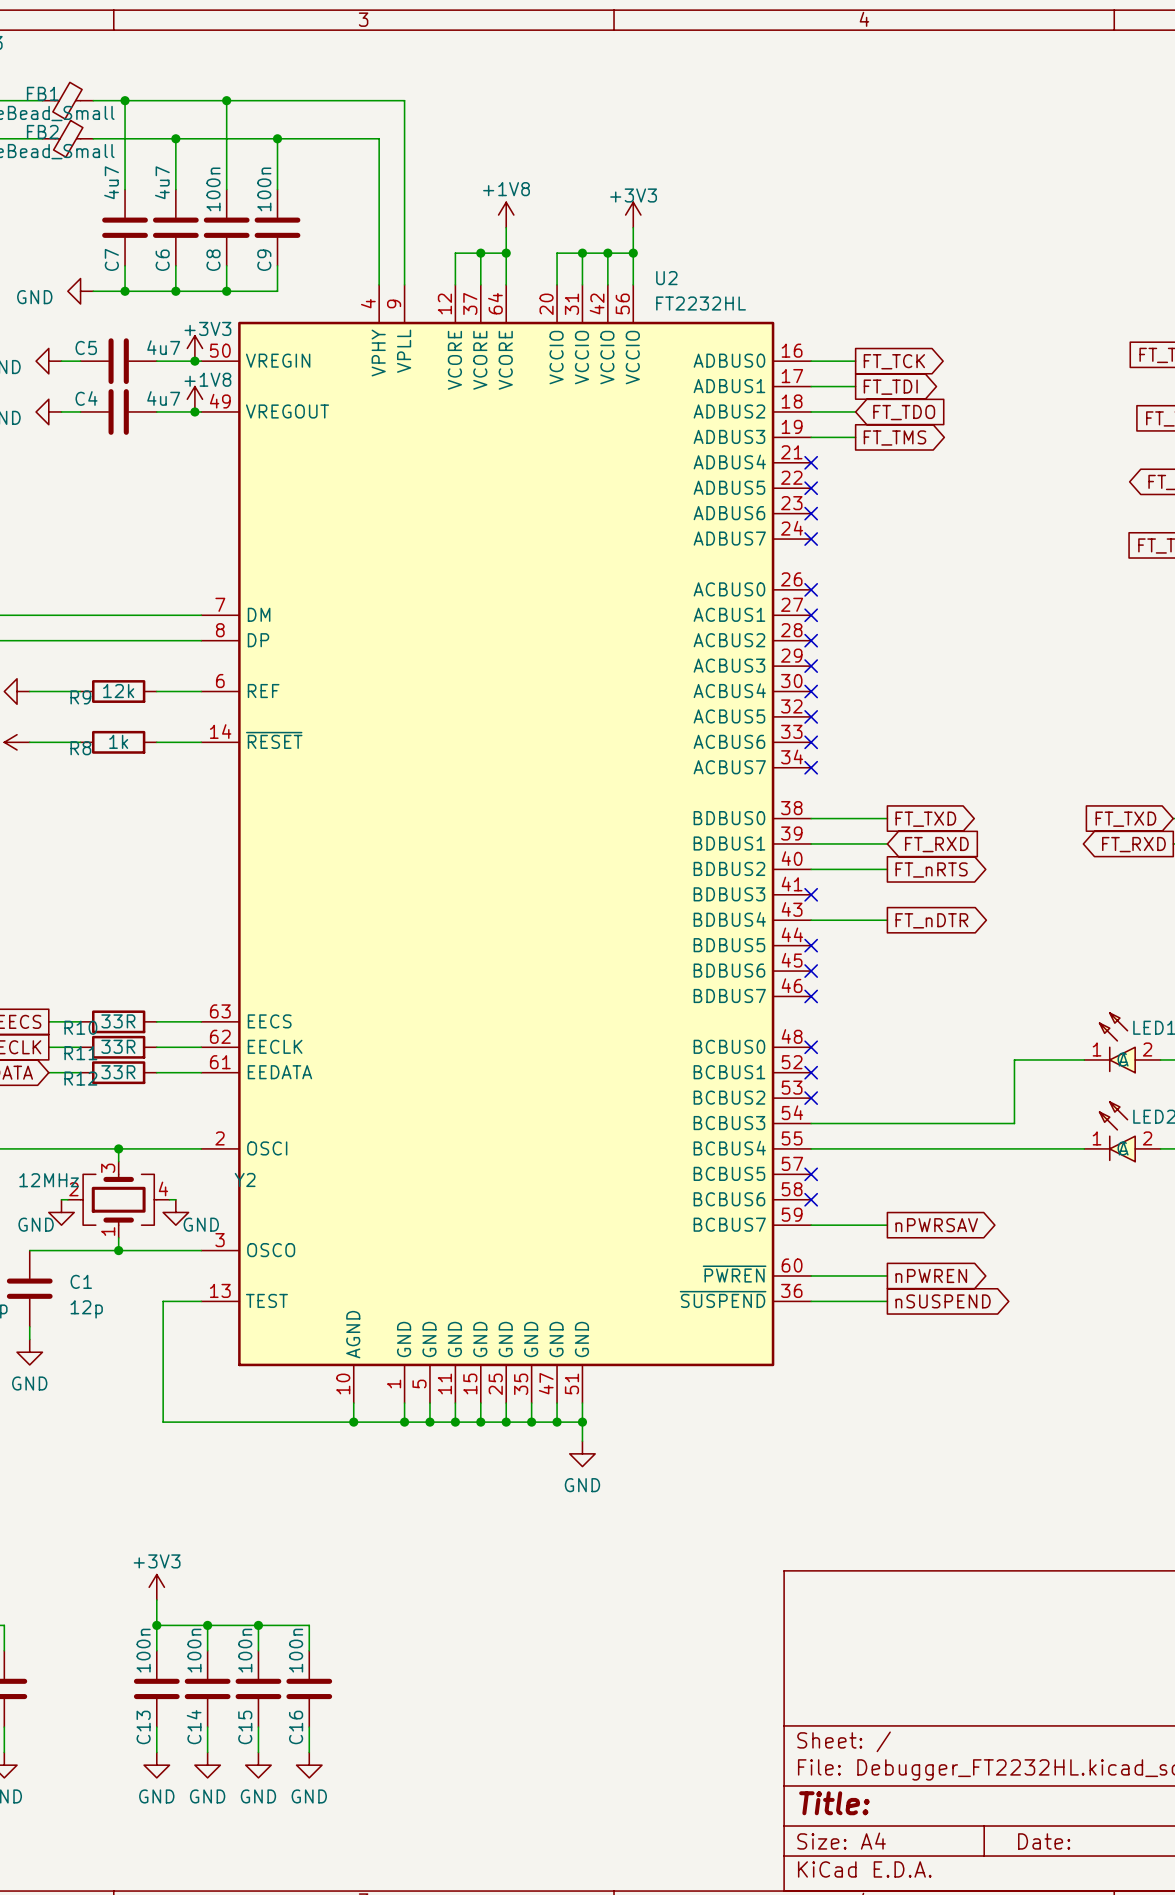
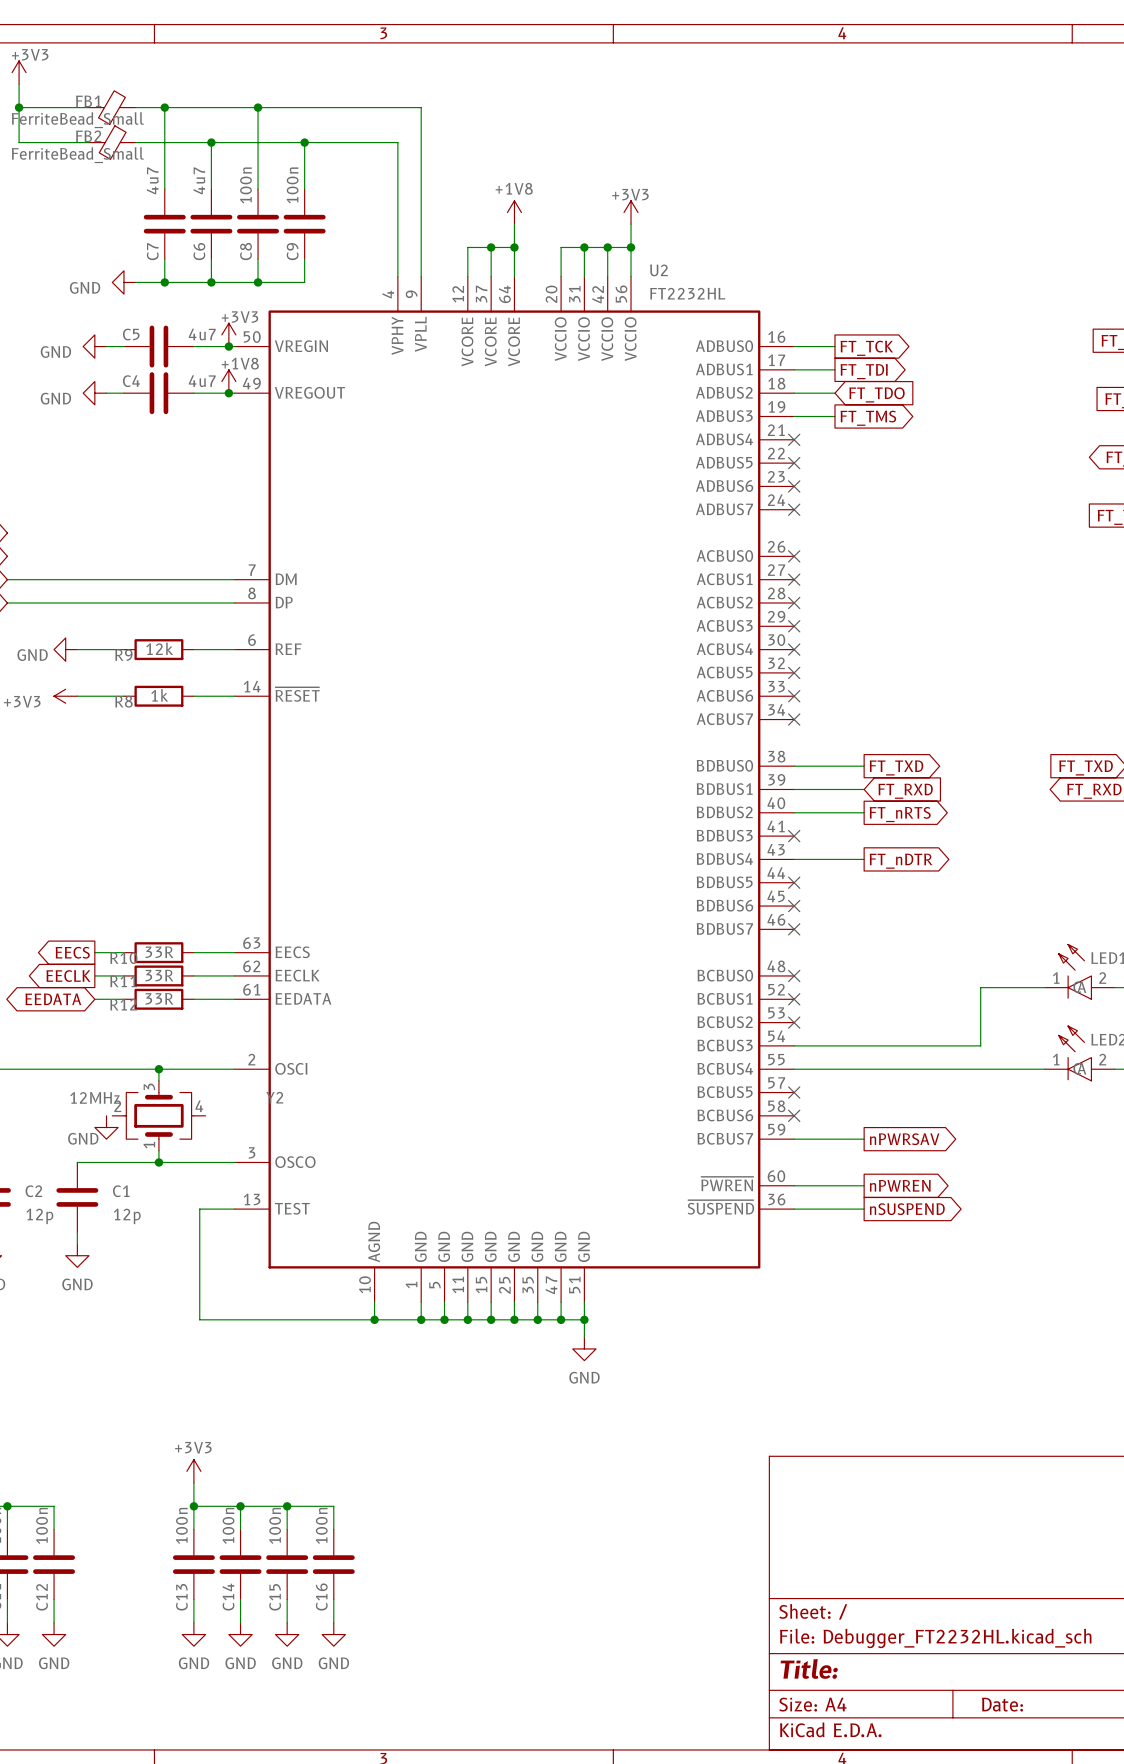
wire: (61, 1199) (67, 1199) -> none
wire: (169, 1199) (175, 1199) -> none
power symbol: GND (175, 1212) -> none

